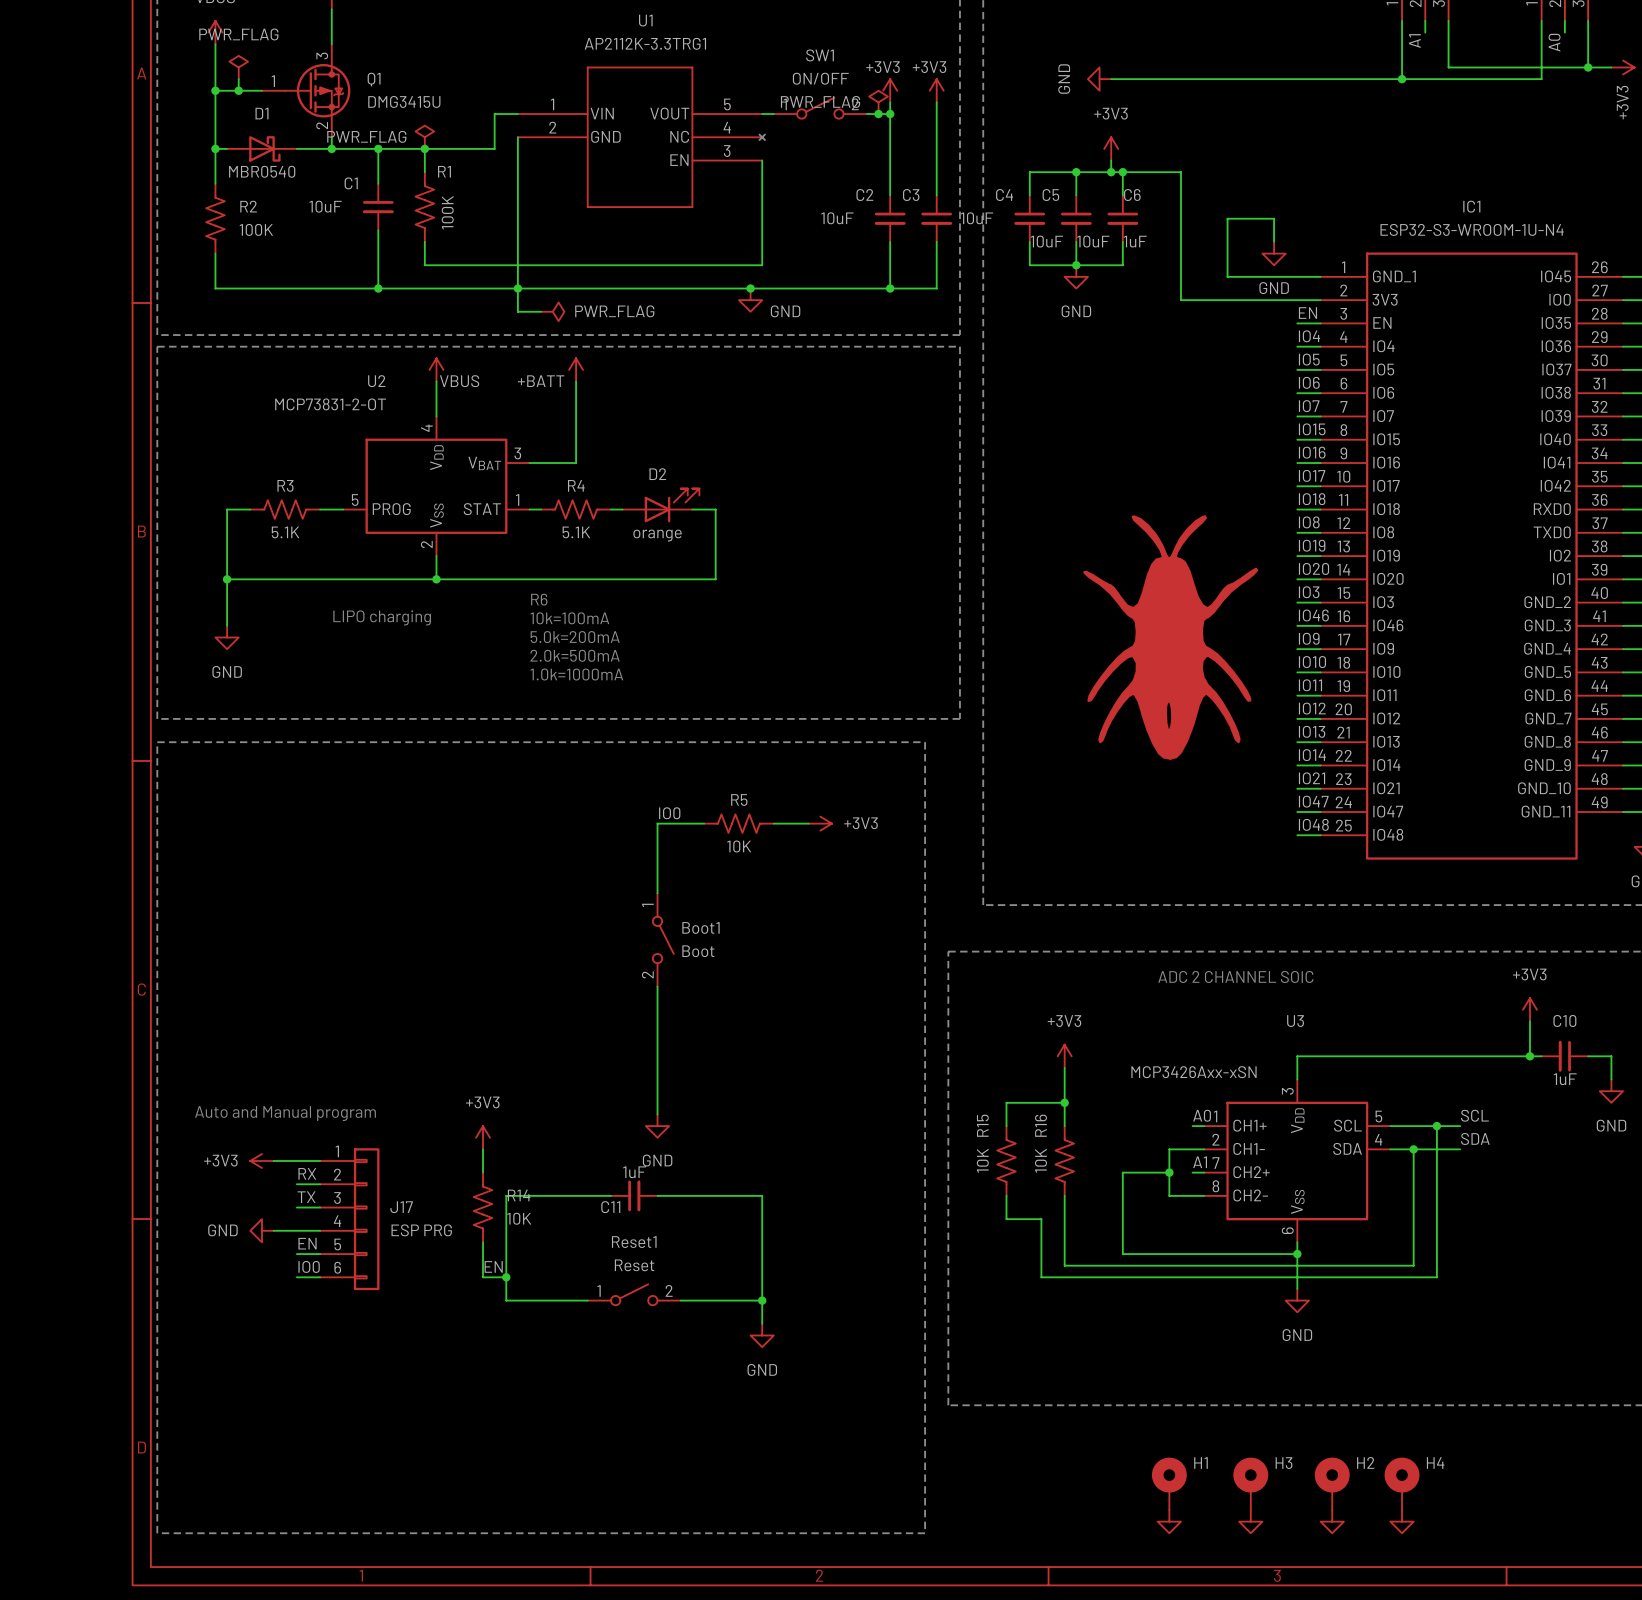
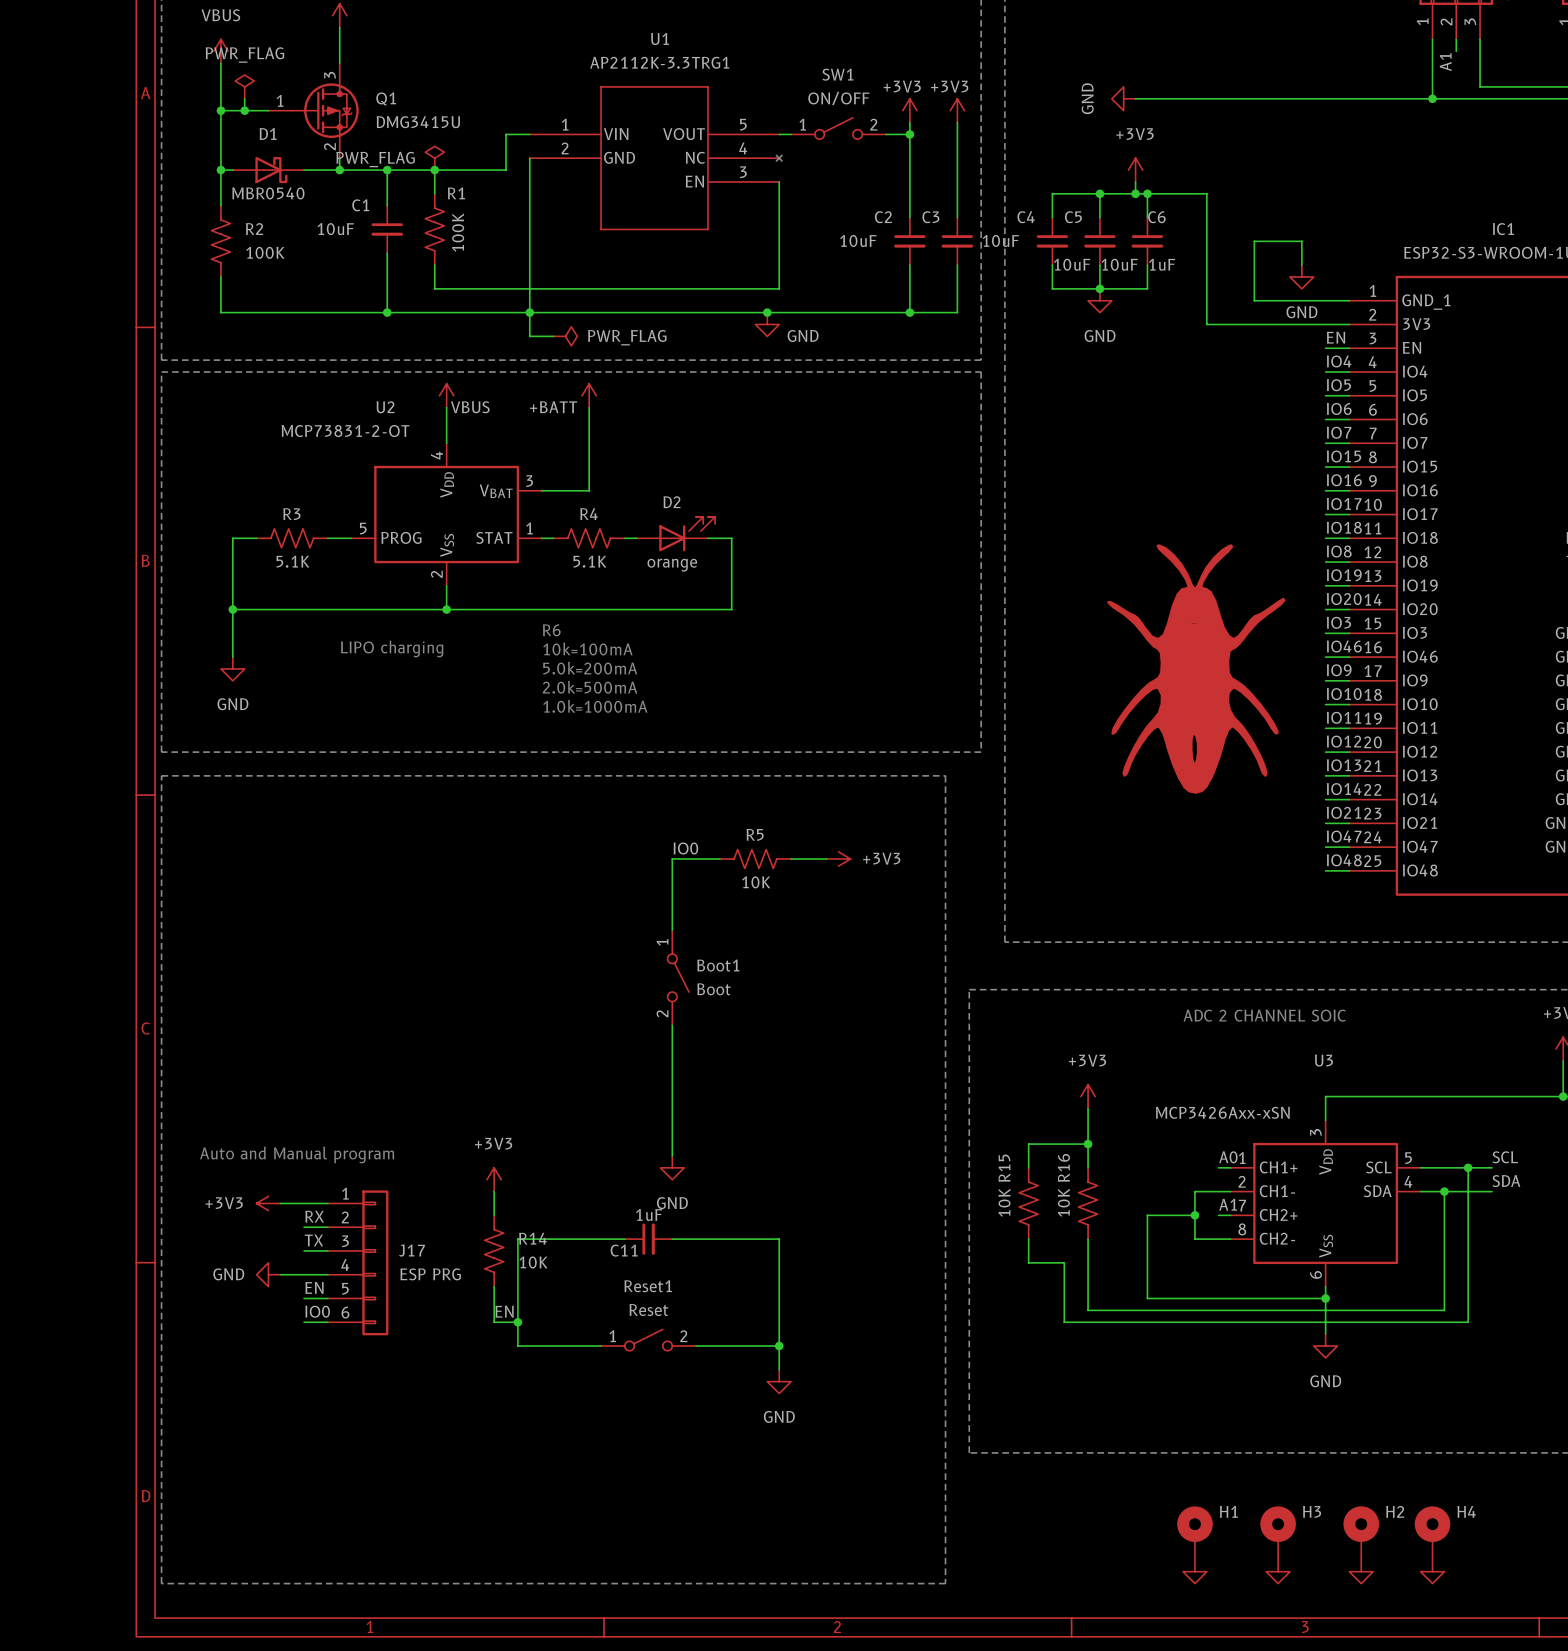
power symbol: PWR_FLAG (878, 102) -> none
junction: (878, 114) -> none

